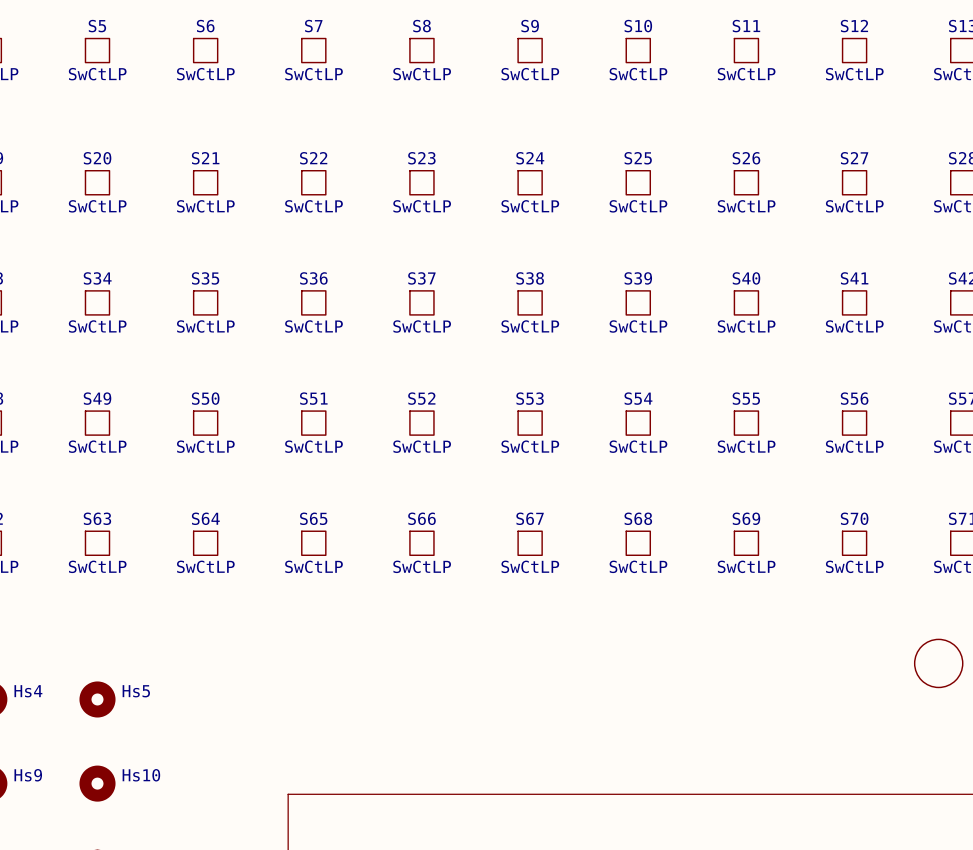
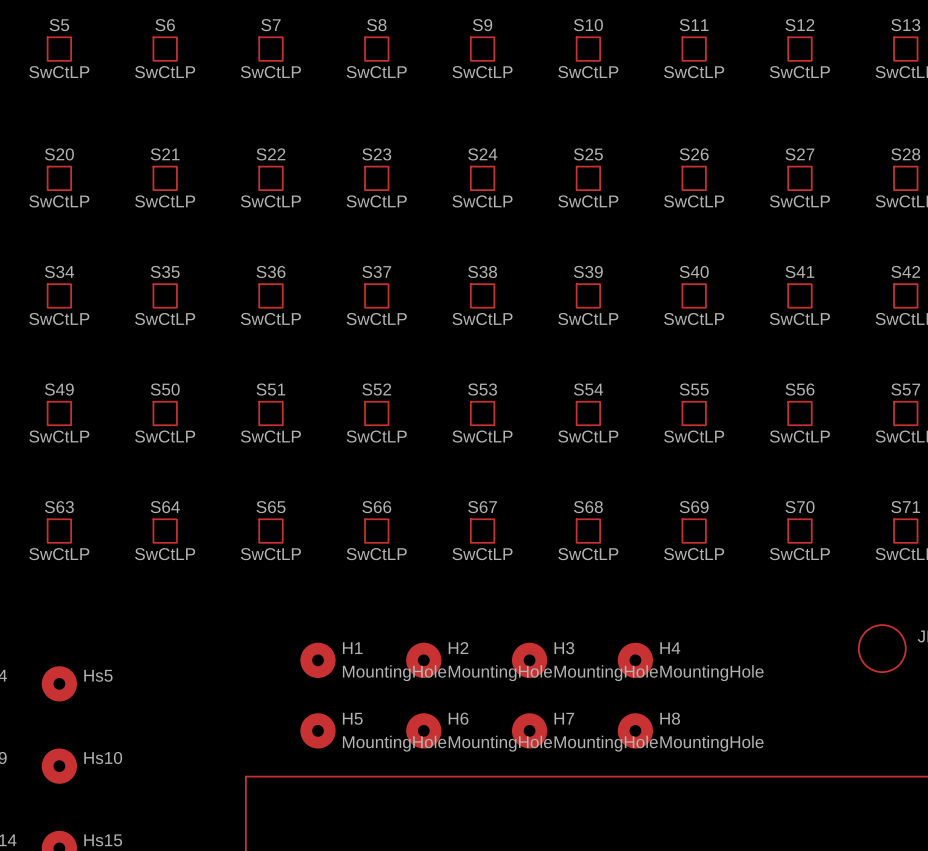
H1: none -> MountingHole (318, 660)
H2: none -> MountingHole (423, 660)
H3: none -> MountingHole (529, 660)
H4: none -> MountingHole (635, 660)
H5: none -> MountingHole (318, 730)
H6: none -> MountingHole (423, 730)
H7: none -> MountingHole (529, 730)
H8: none -> MountingHole (635, 730)

